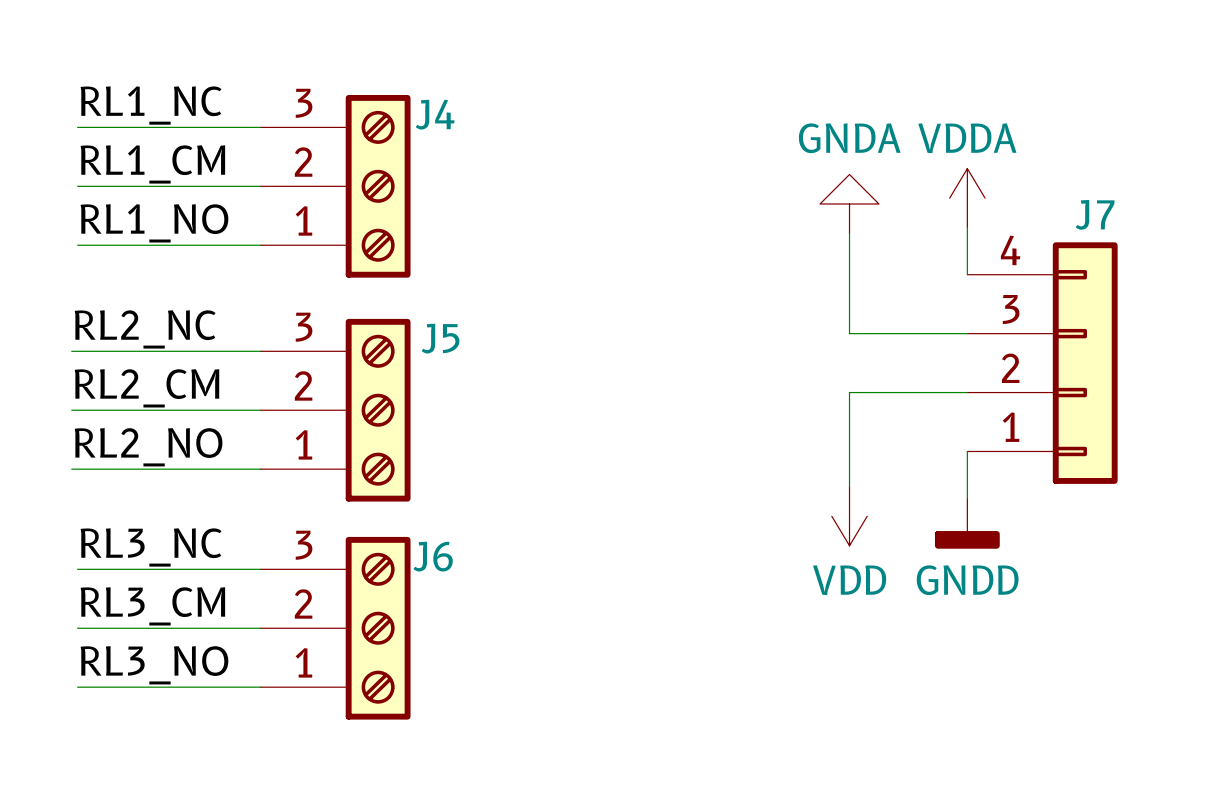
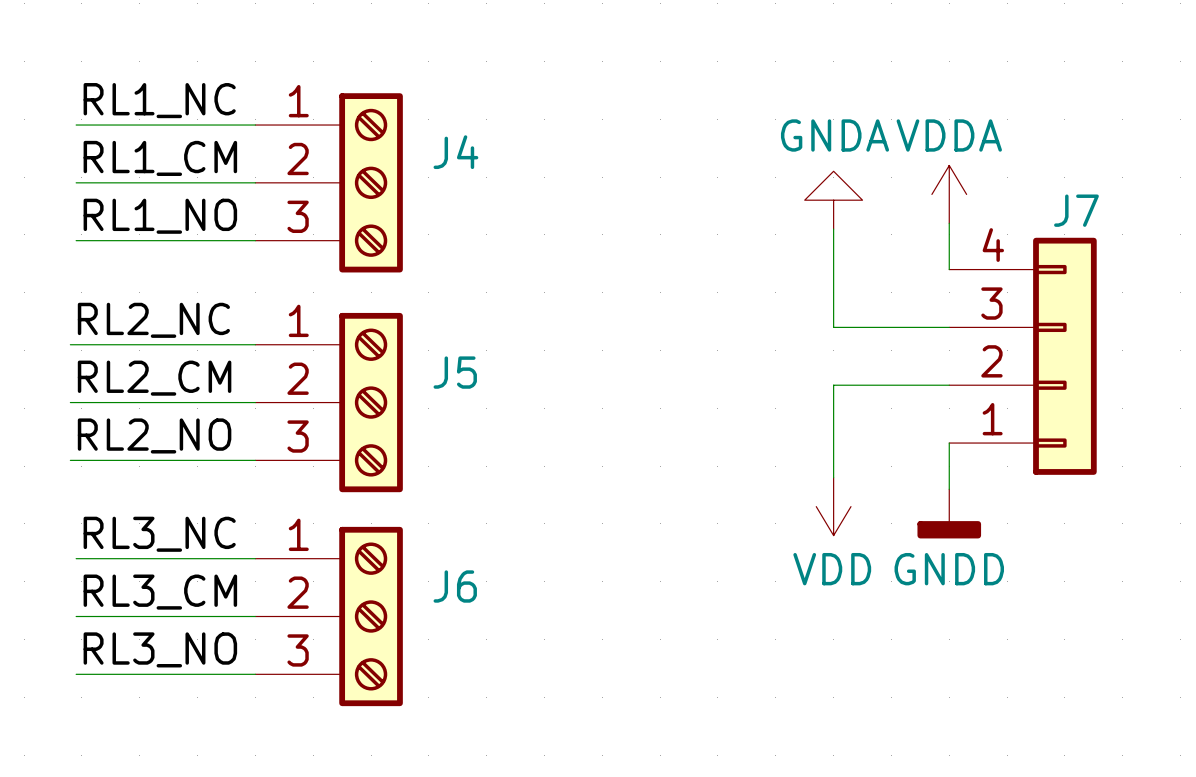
J4 name position: J4 (435, 114) -> J4 (455, 152)
J4 flip: as is (378, 186) -> up-down (371, 182)
J5 name position: J5 (440, 338) -> J5 (455, 372)
J5 flip: as is (378, 410) -> up-down (371, 402)
J6 name position: J6 (433, 556) -> J6 (455, 586)
J6 flip: as is (378, 628) -> up-down (371, 616)

